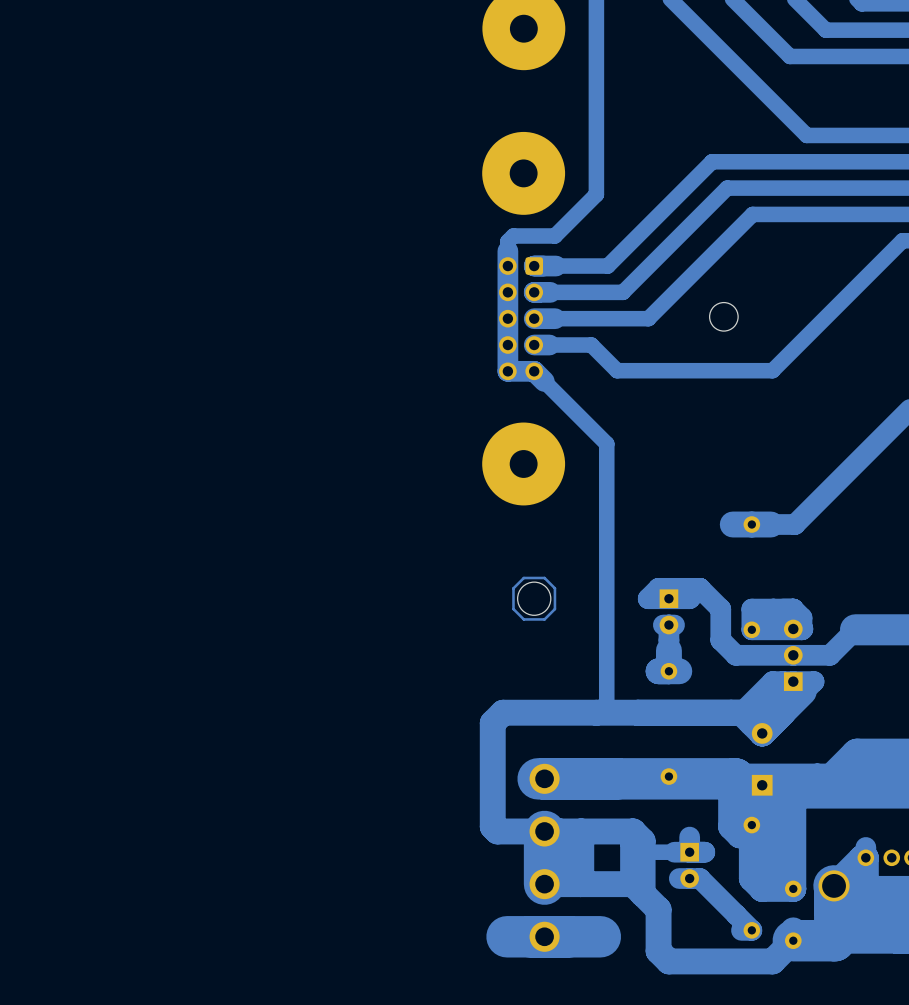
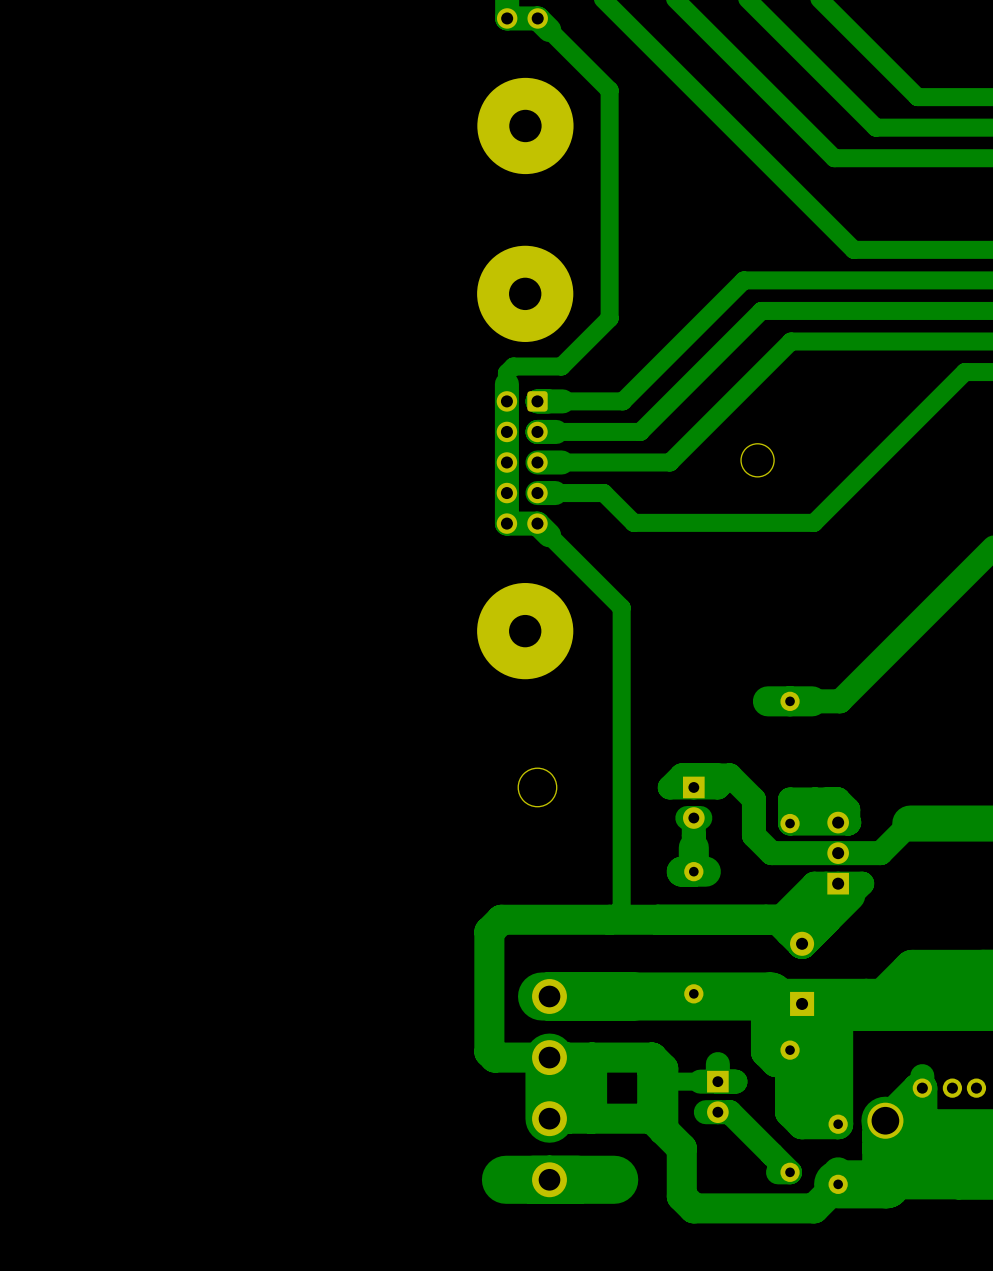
bottom track: (544, 577) (554, 588) (554, 609) (544, 619) (523, 619) (513, 609) (513, 588) (523, 577) (544, 577) -> none

